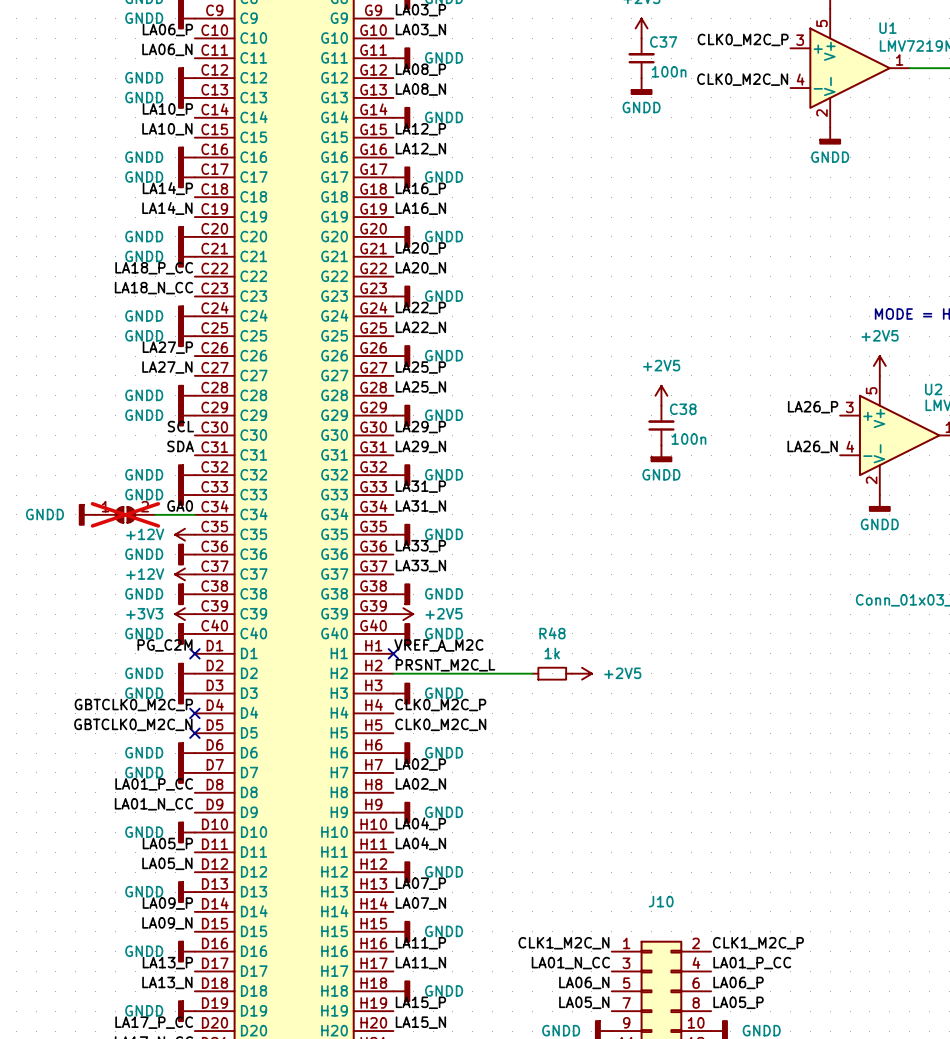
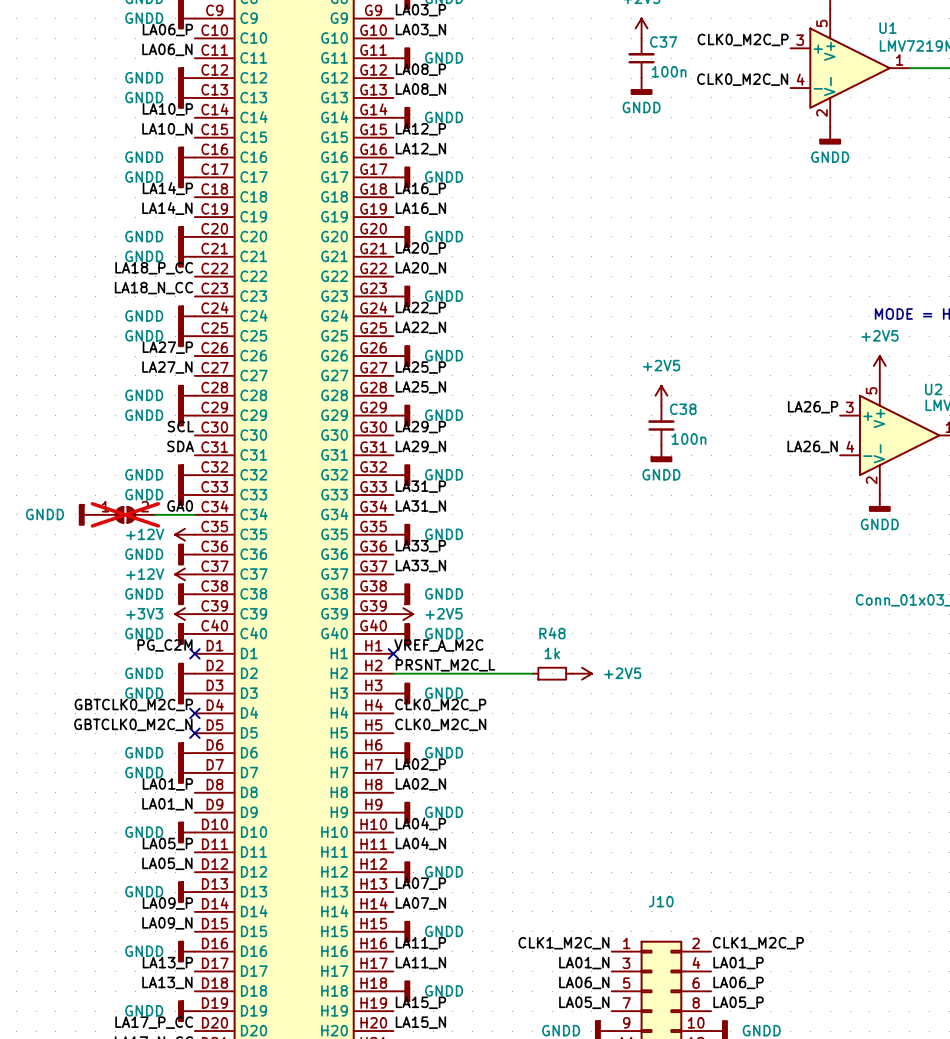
label: LA01_P_CC (154, 784) -> LA01_P (167, 784)
label: LA01_N_CC (153, 804) -> LA01_N (167, 804)
label: LA01_N_CC (570, 963) -> LA01_N (584, 963)
label: LA01_P_CC (752, 963) -> LA01_P (738, 963)

